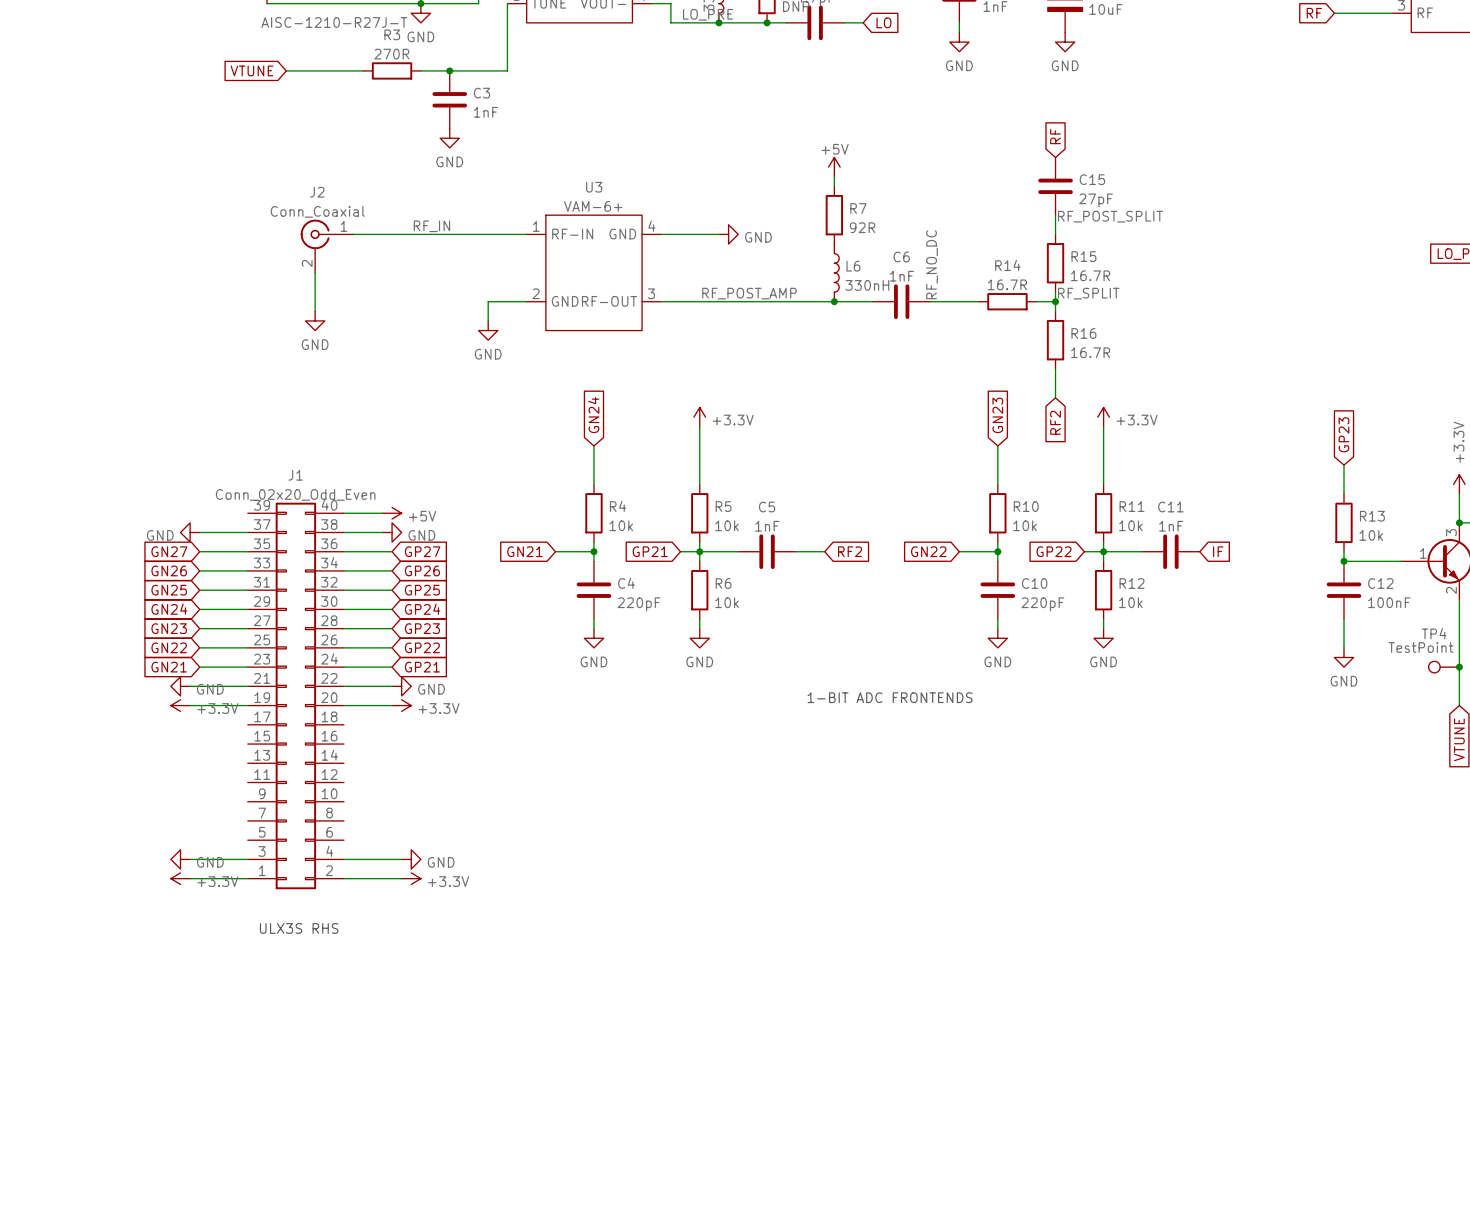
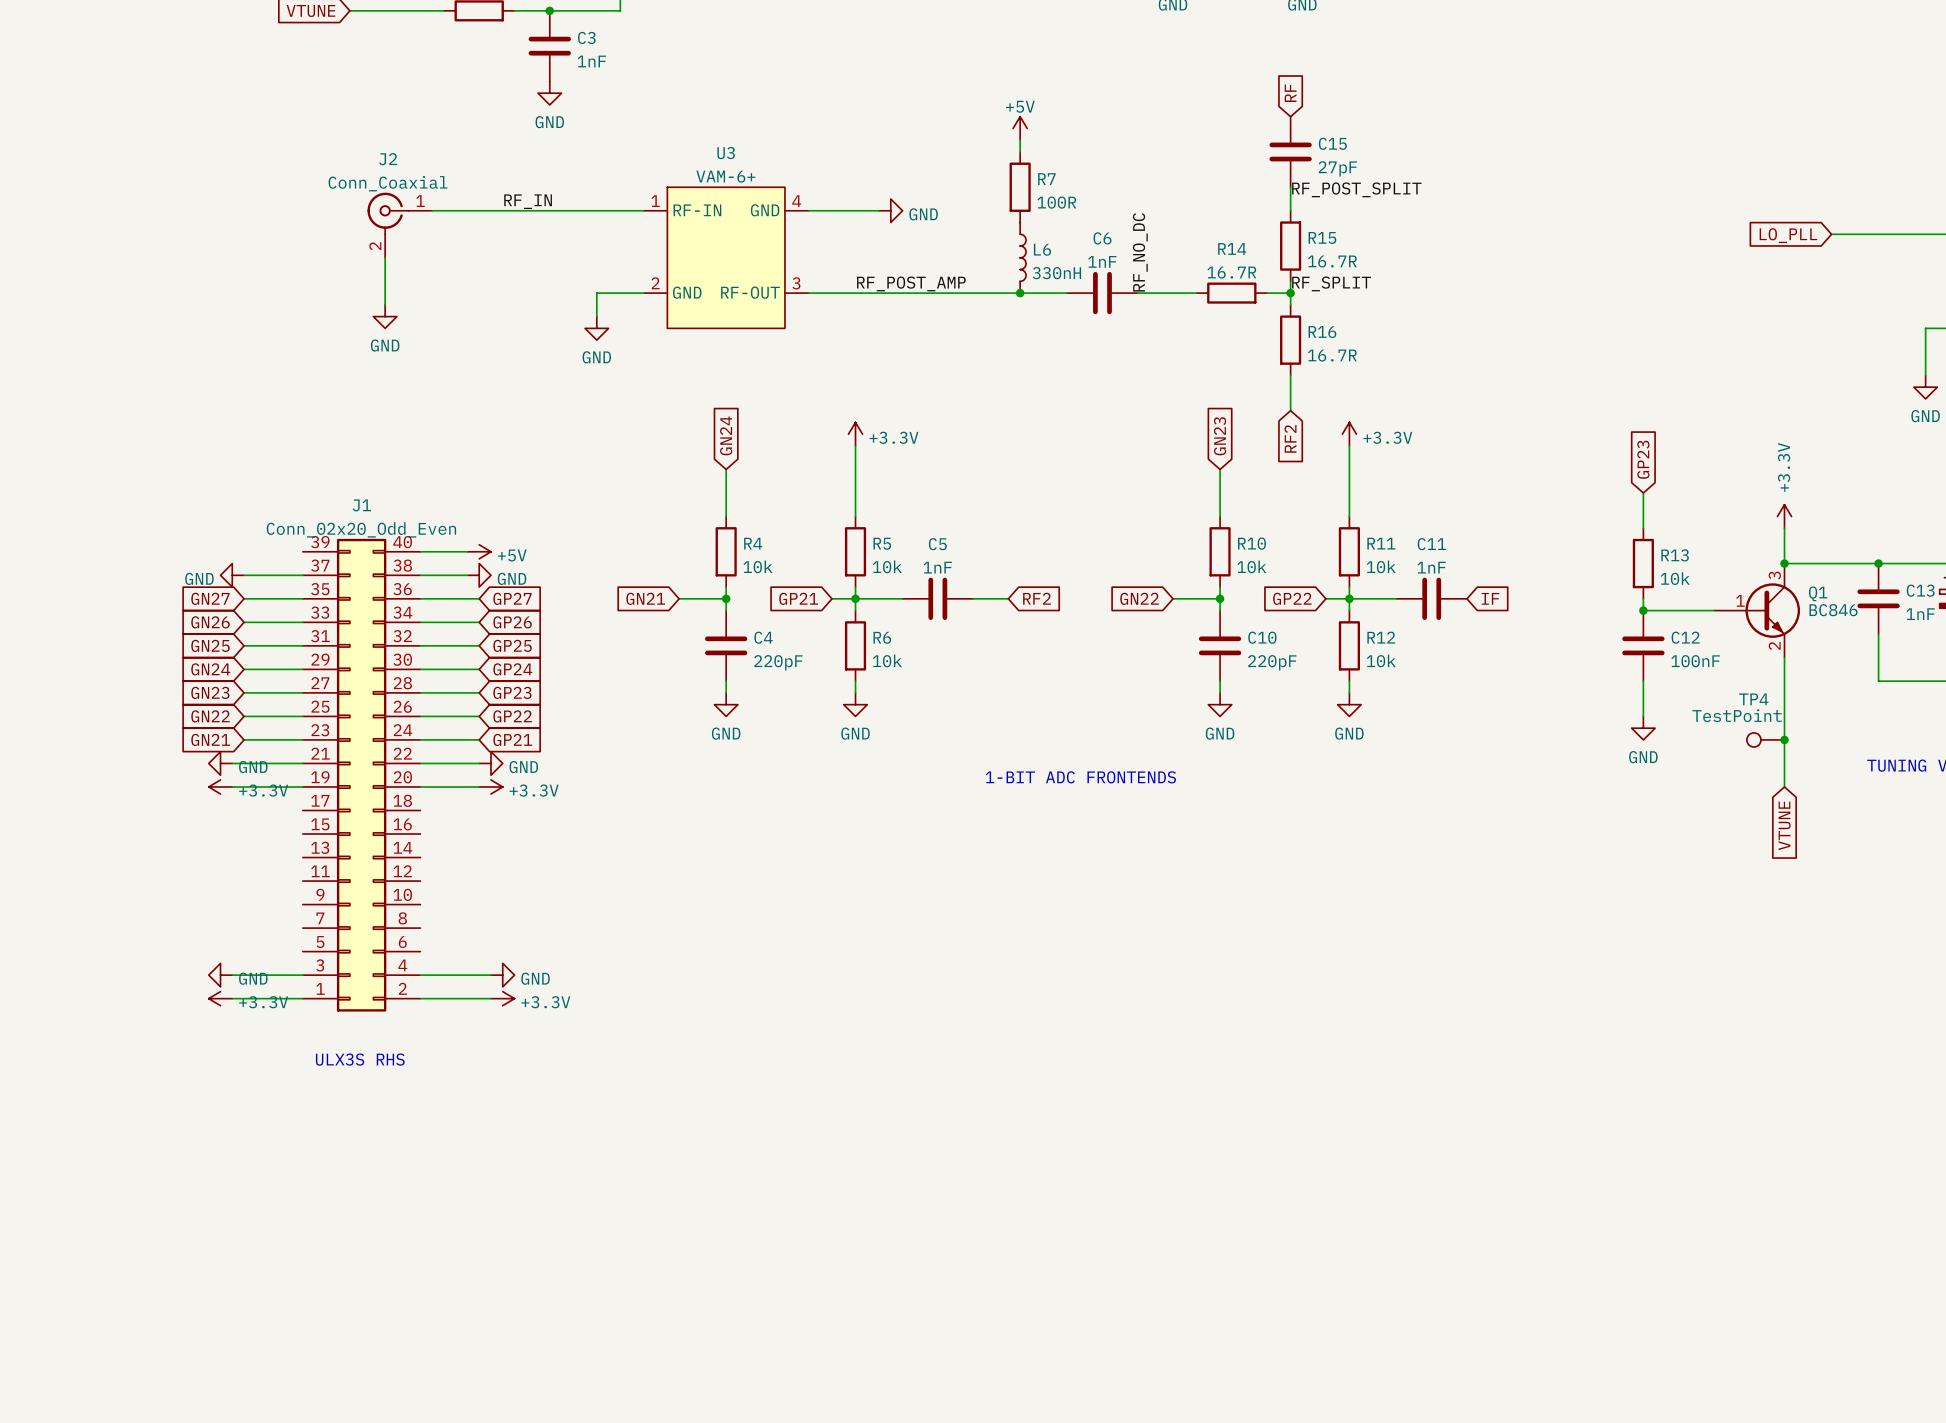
R7 value: 92R (862, 227) -> 100R (1056, 202)

